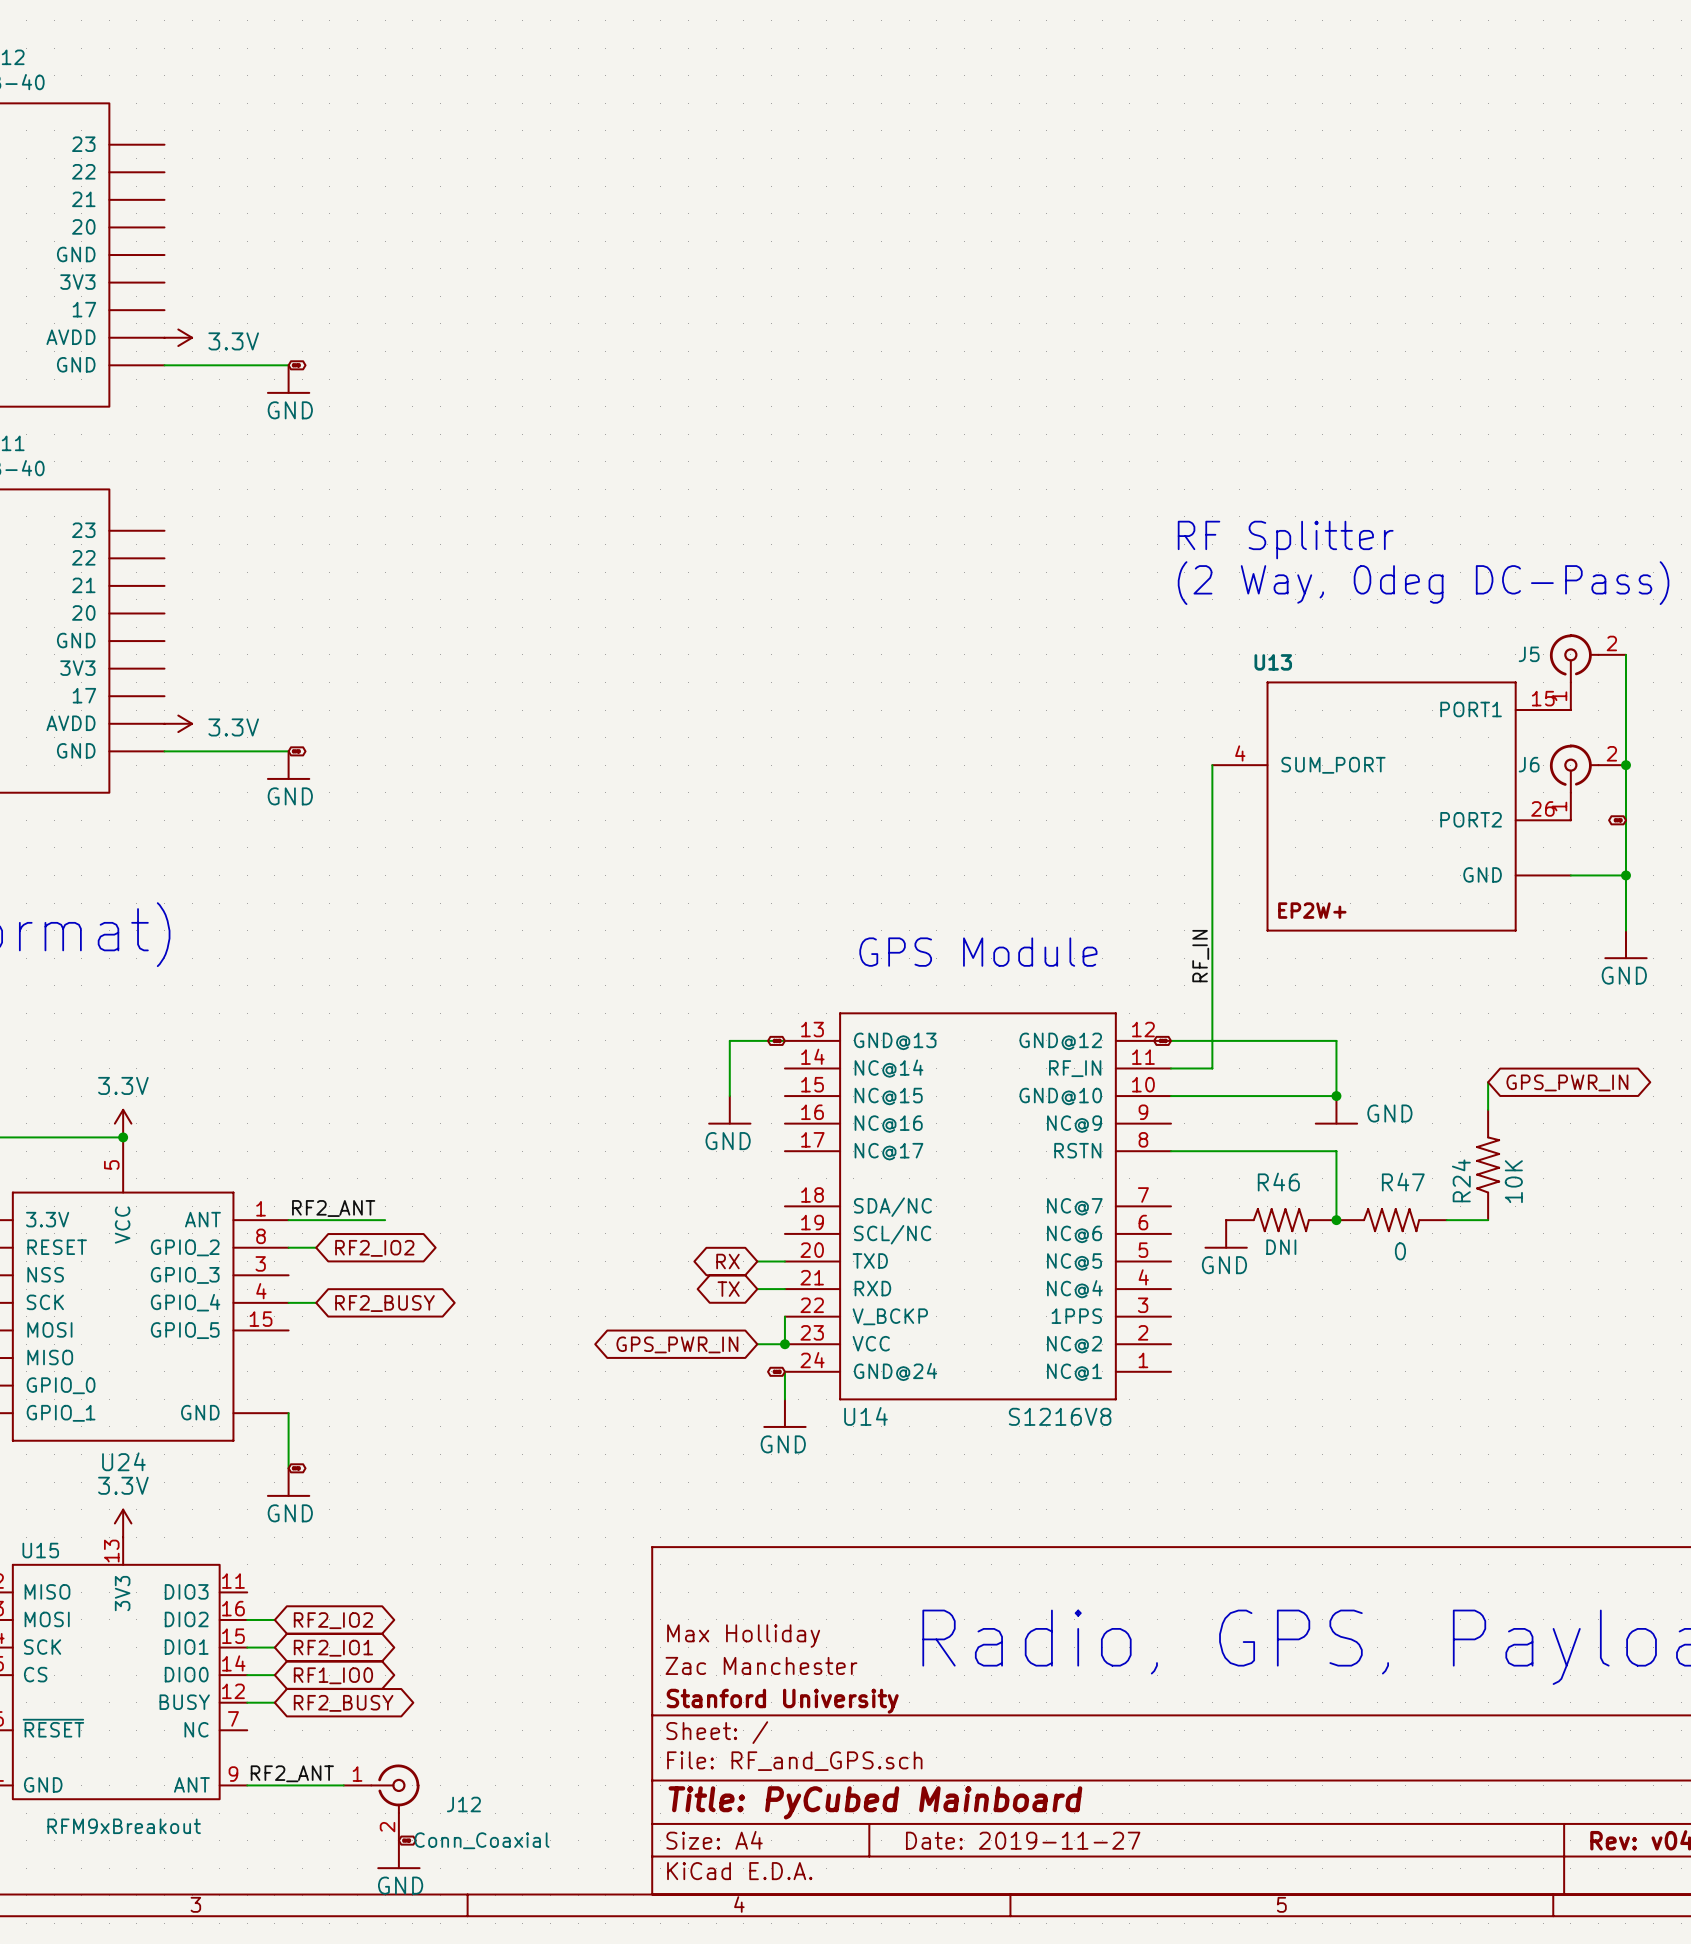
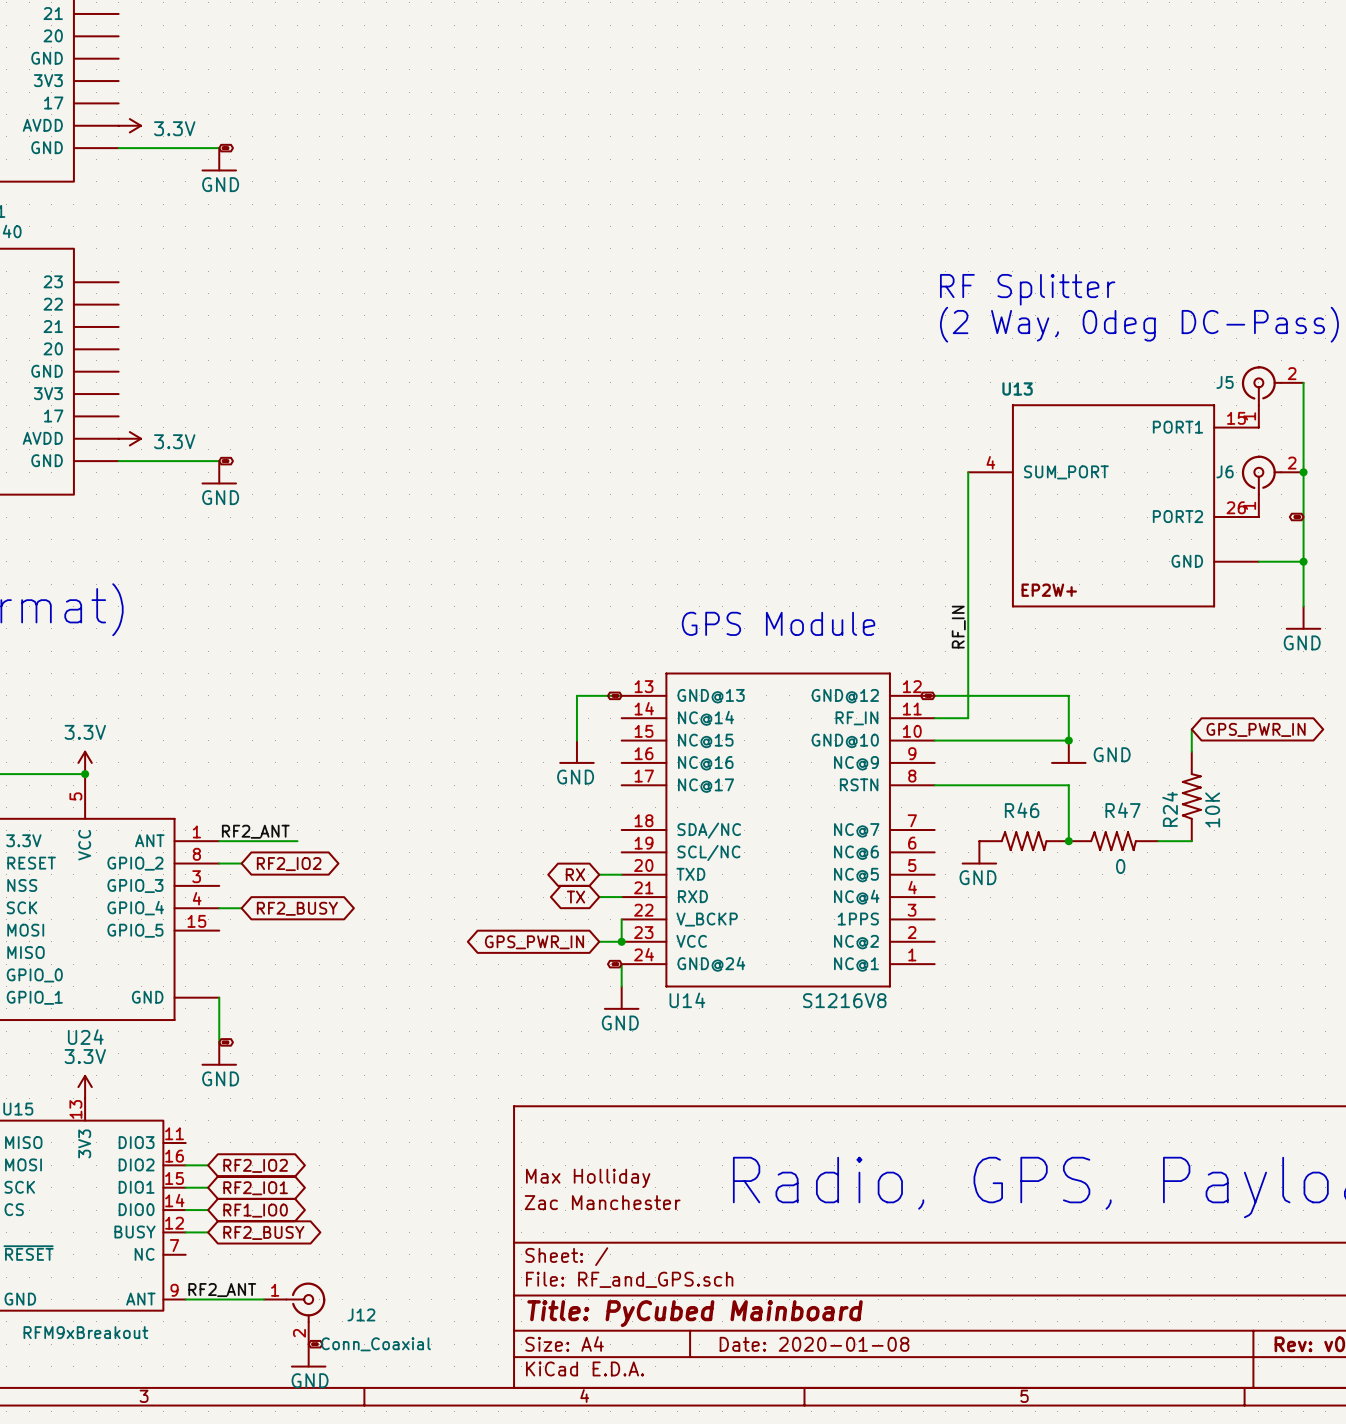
R46 text: DNI (1281, 1247) -> none
title block: Stanford University (782, 1701) -> none
title block: Date: 2019-11-27 (1023, 1840) -> Date: 2020-01-08 (814, 1344)

